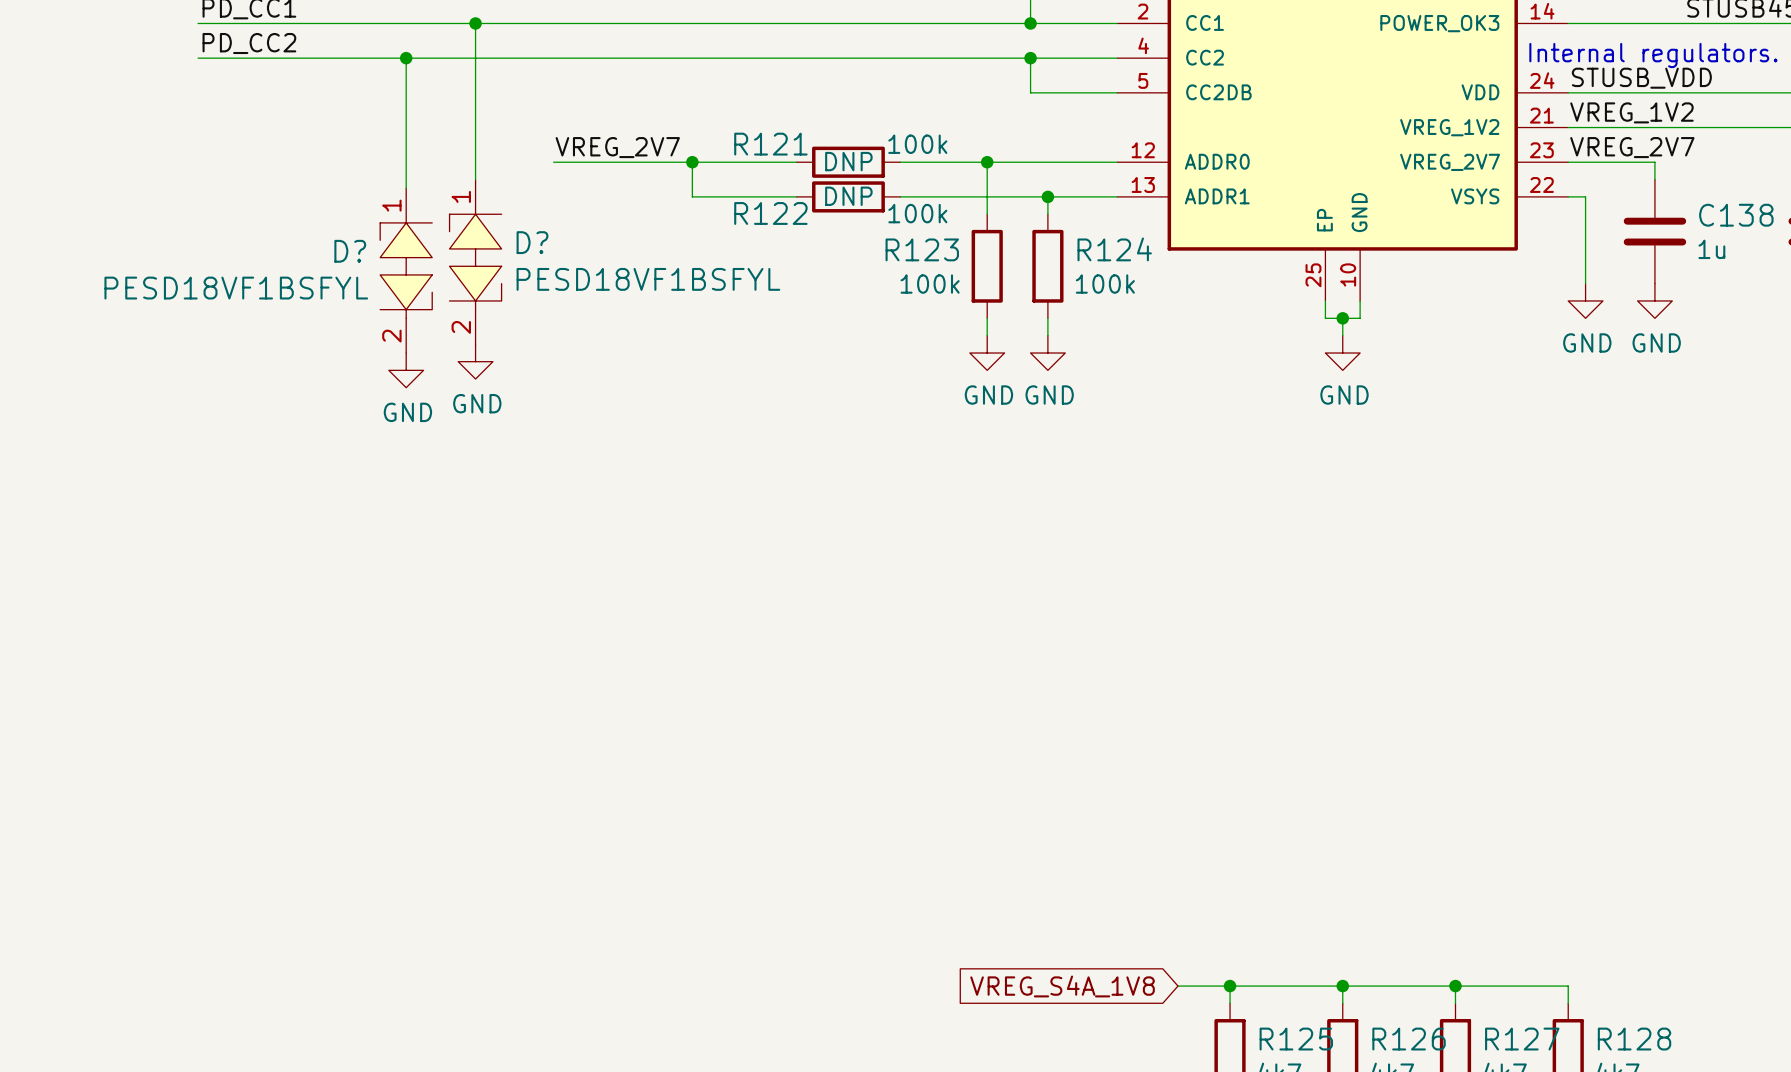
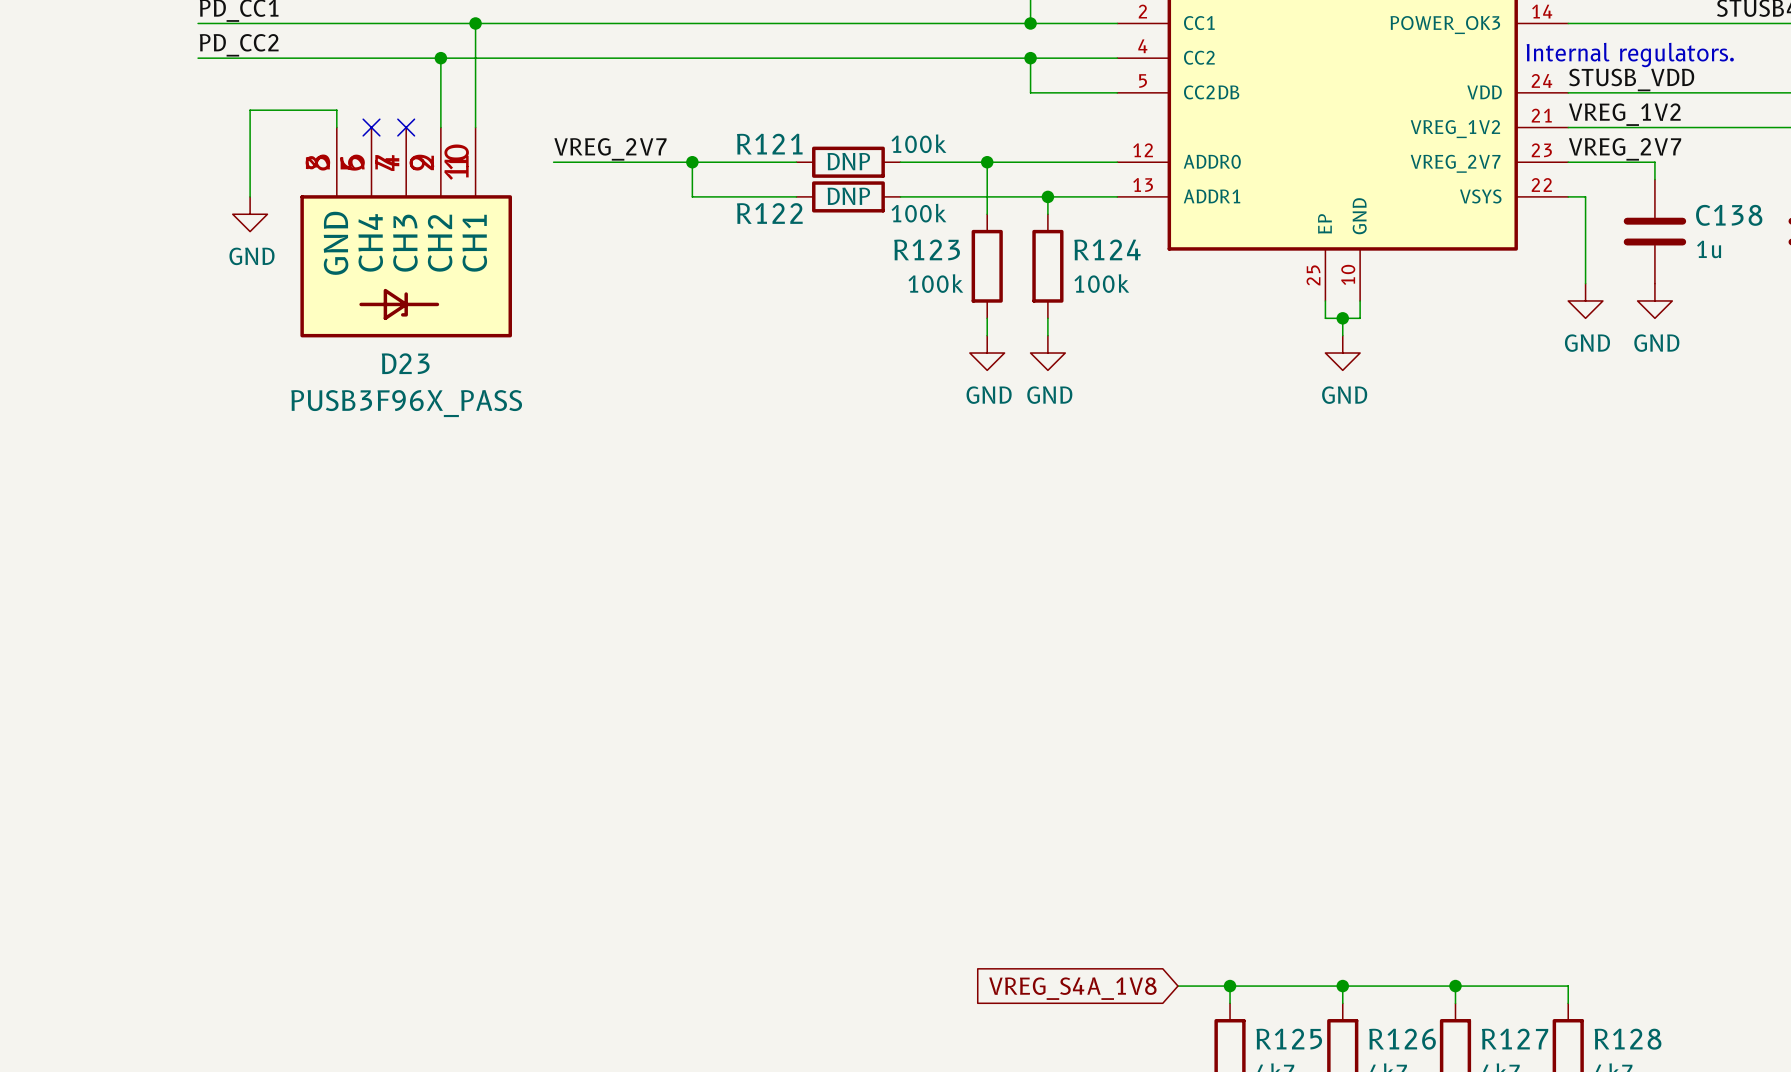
wire: (406, 58) (406, 188) -> none
junction position: (406, 58) -> (440, 58)
wire: none -> (440, 58) (440, 127)
wire: none -> (336, 127) (336, 110) (250, 110) (250, 196)
no-connect mark: none -> (371, 127)
no-connect mark: none -> (406, 127)
power symbol: none -> GND (250, 214)
D23: none -> PUSB3F96X_PASS (406, 232)
D?: PESD18VF1BSFYL (475, 261) -> none
D?: PESD18VF1BSFYL (406, 270) -> none
power symbol: GND (475, 361) -> none
power symbol: GND (406, 370) -> none

